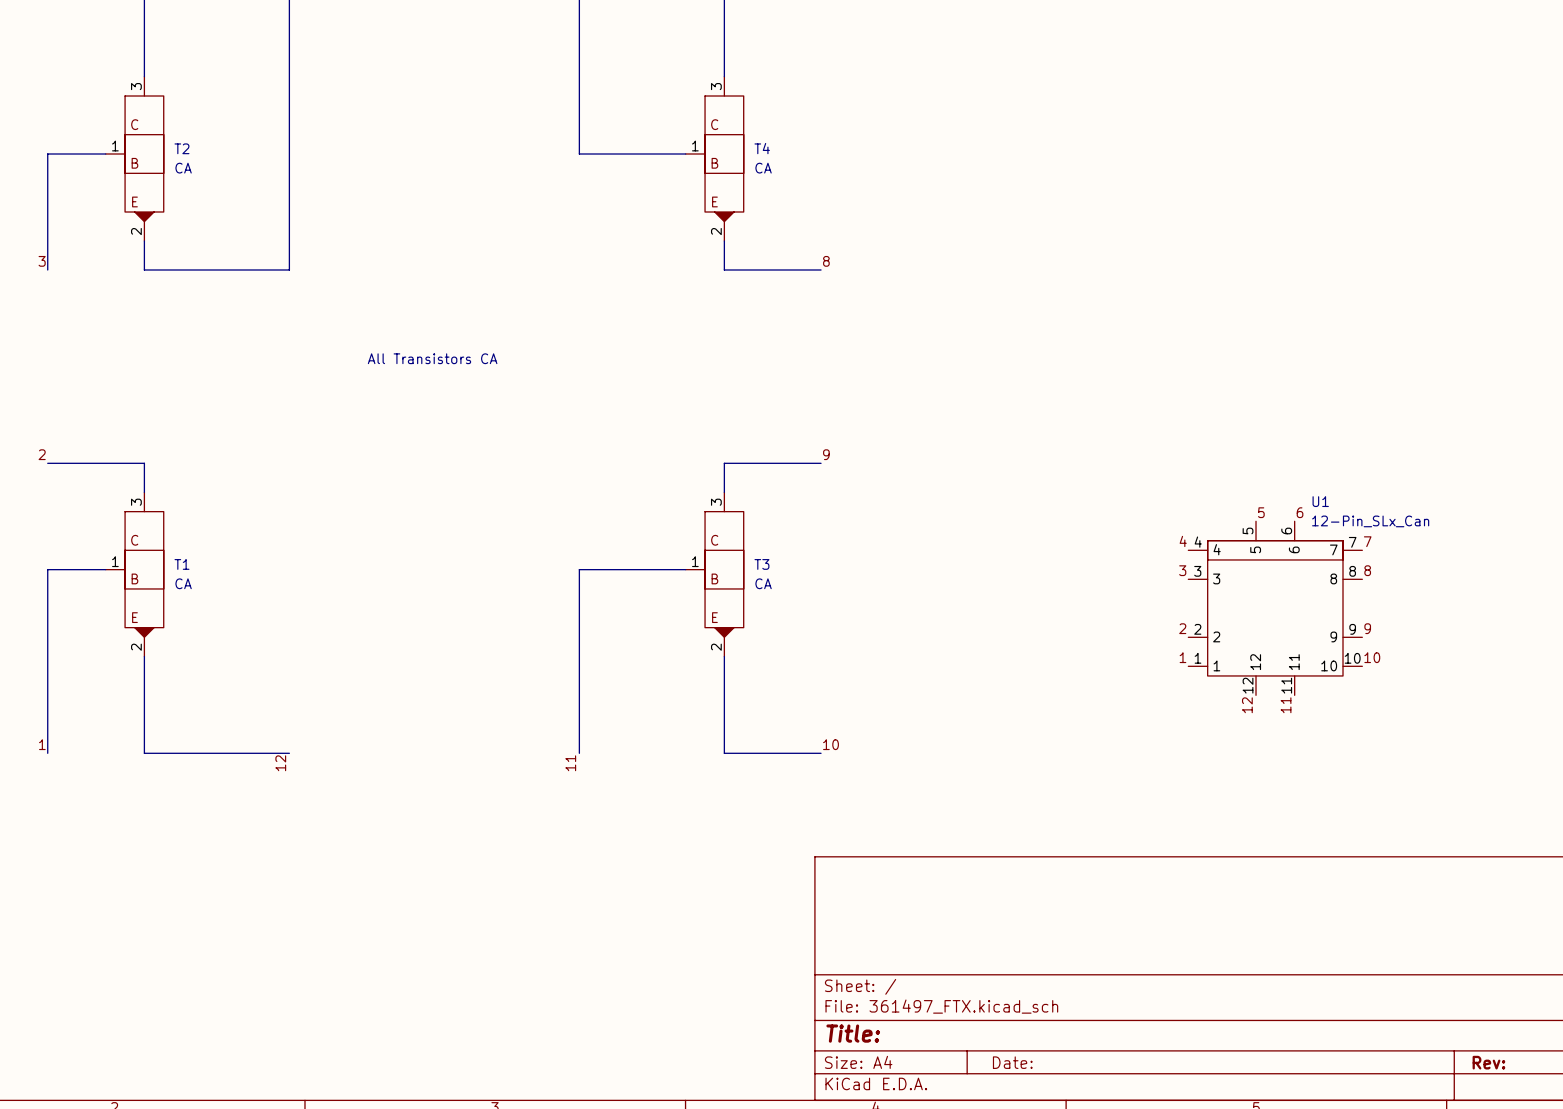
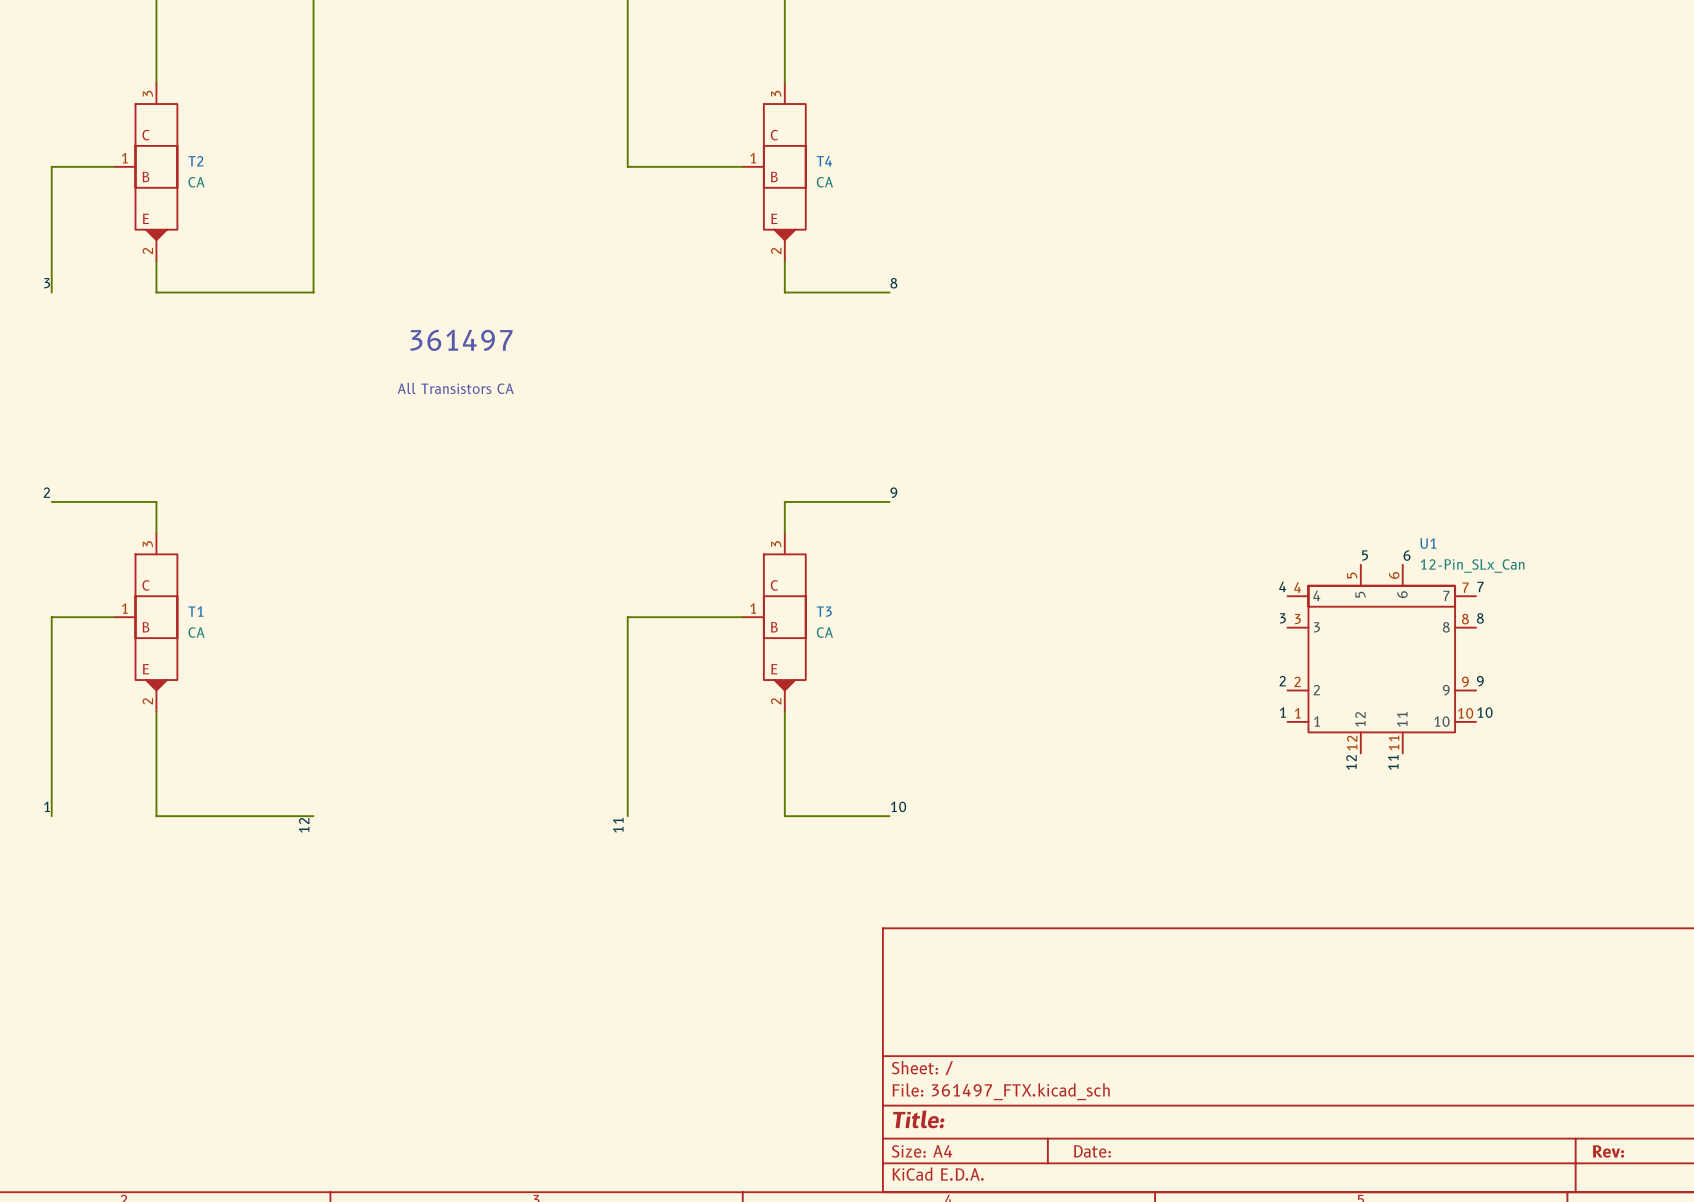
text: none -> 361497 (461, 340)

